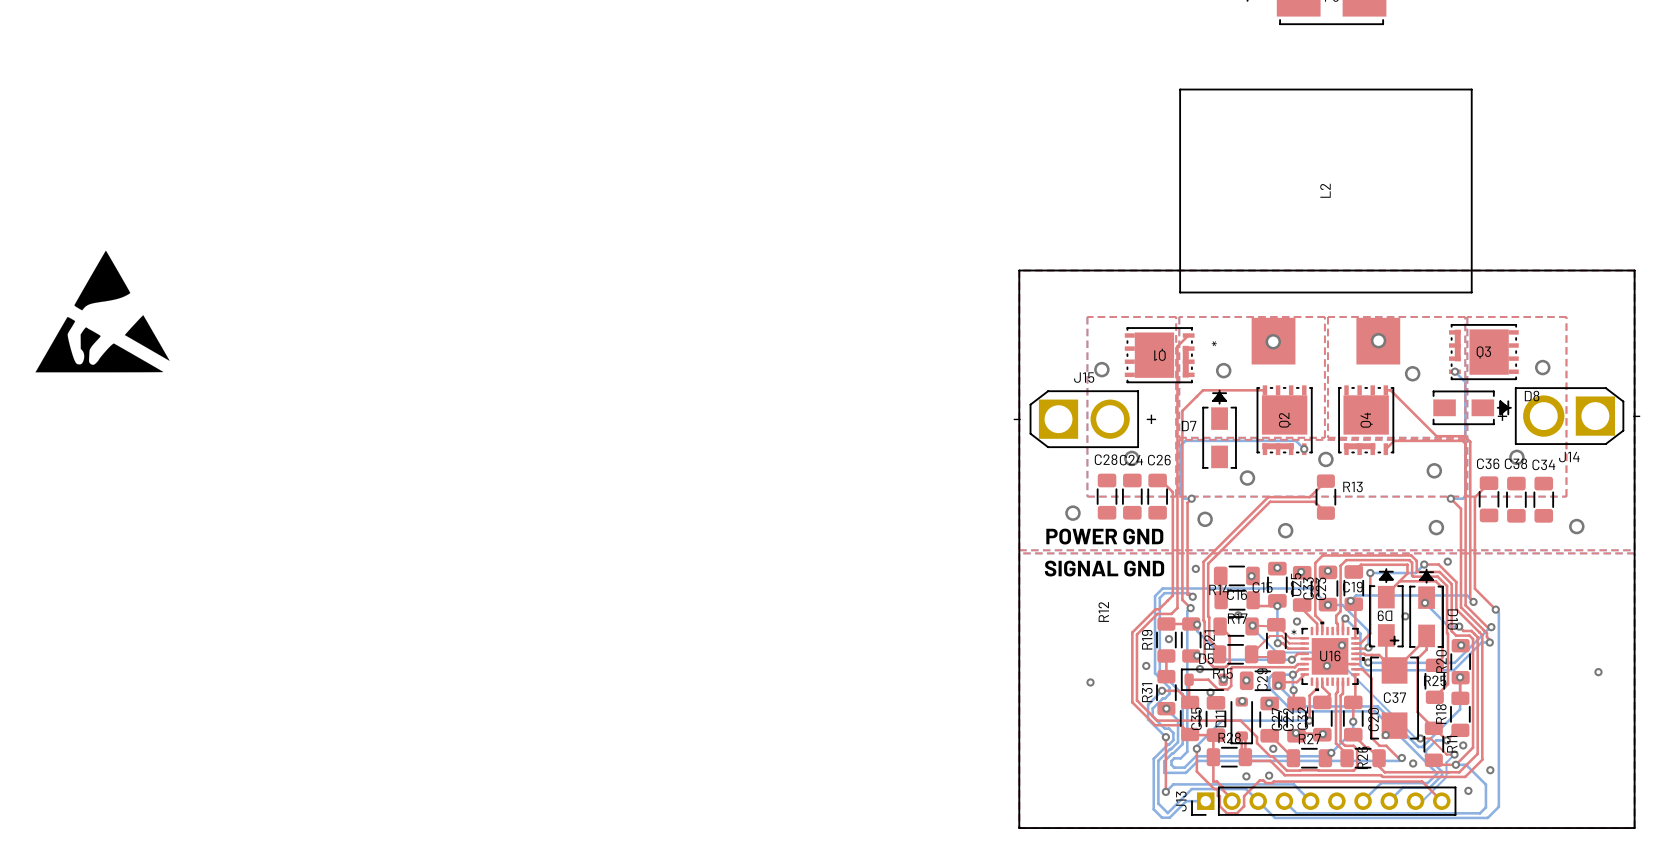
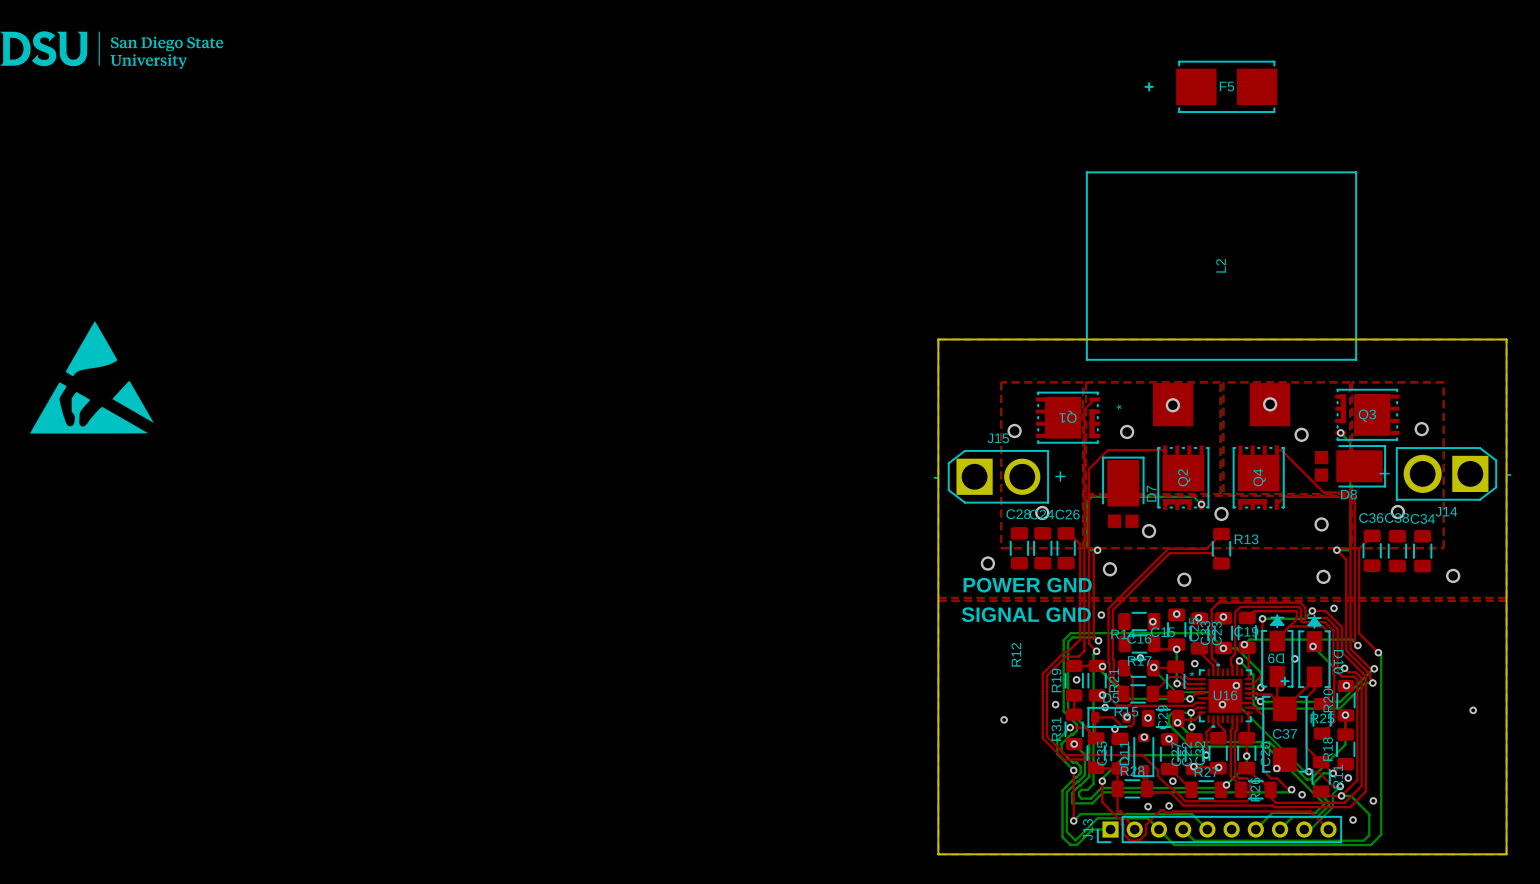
D7 footprint: [1202, 389, 1237, 469] -> [1102, 457, 1145, 528]
D8 footprint: [1432, 390, 1512, 426] -> [1314, 445, 1386, 488]
D8 name position: D8 (1532, 396) -> D8 (1349, 494)
D7 name position: D7 (1189, 426) -> D7 (1151, 493)

